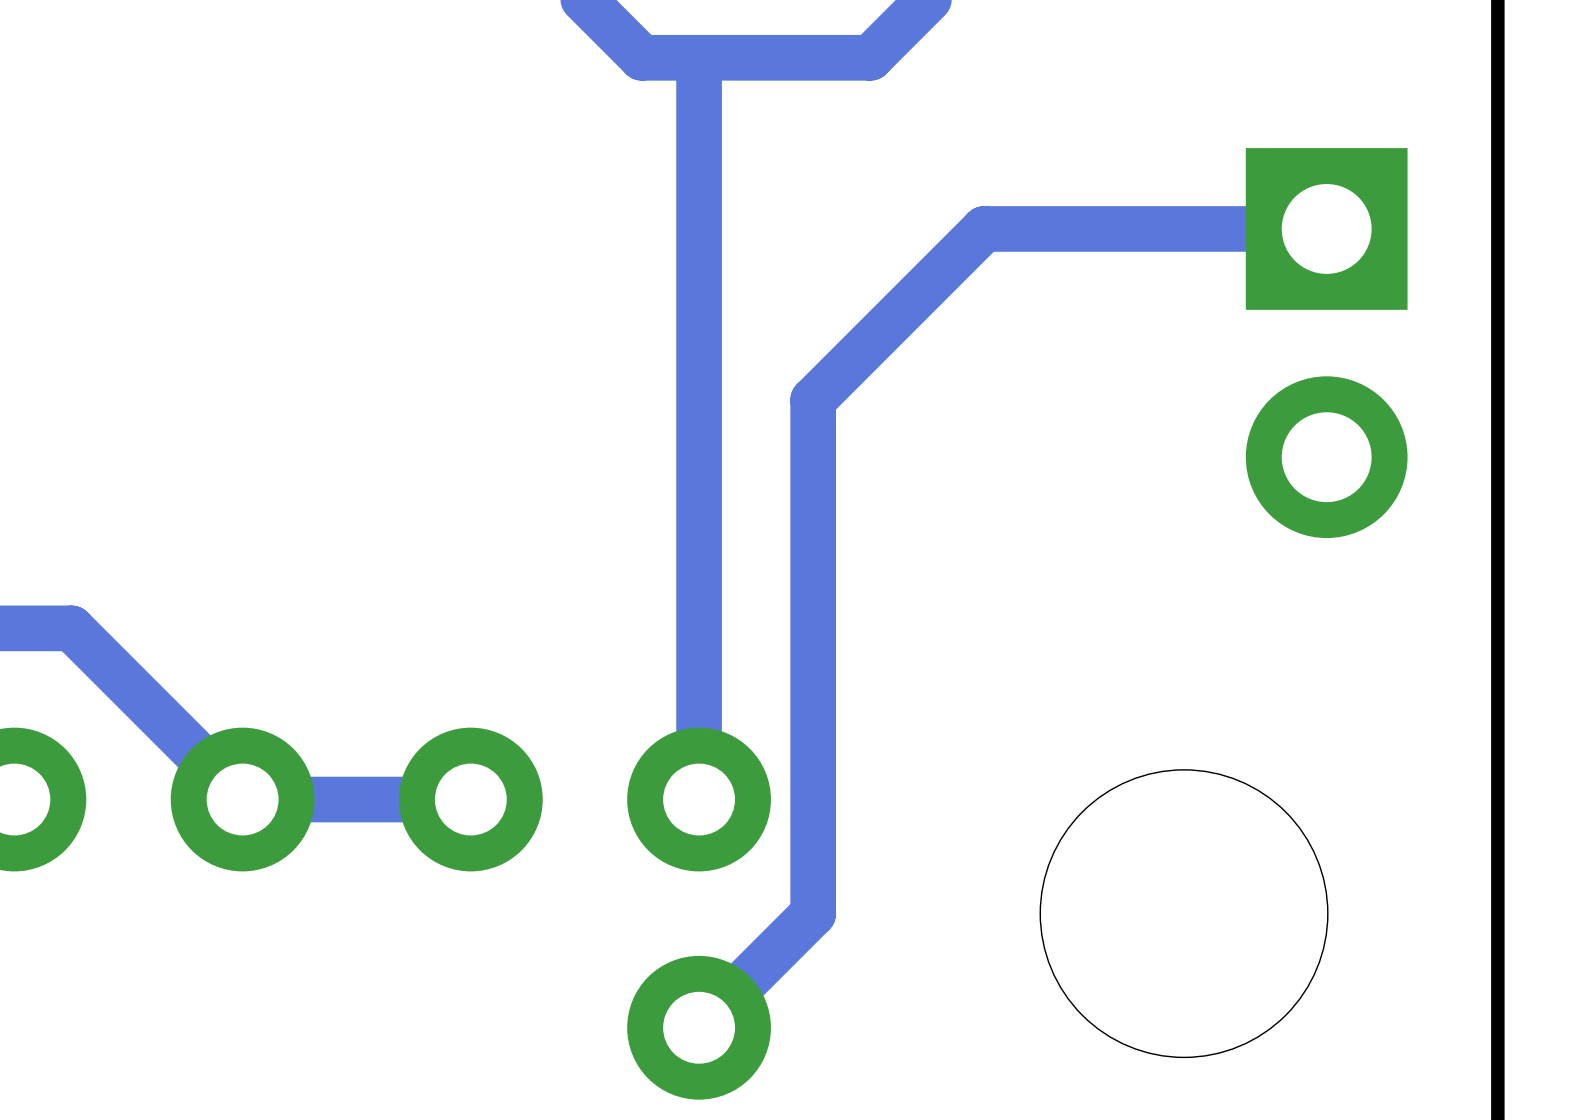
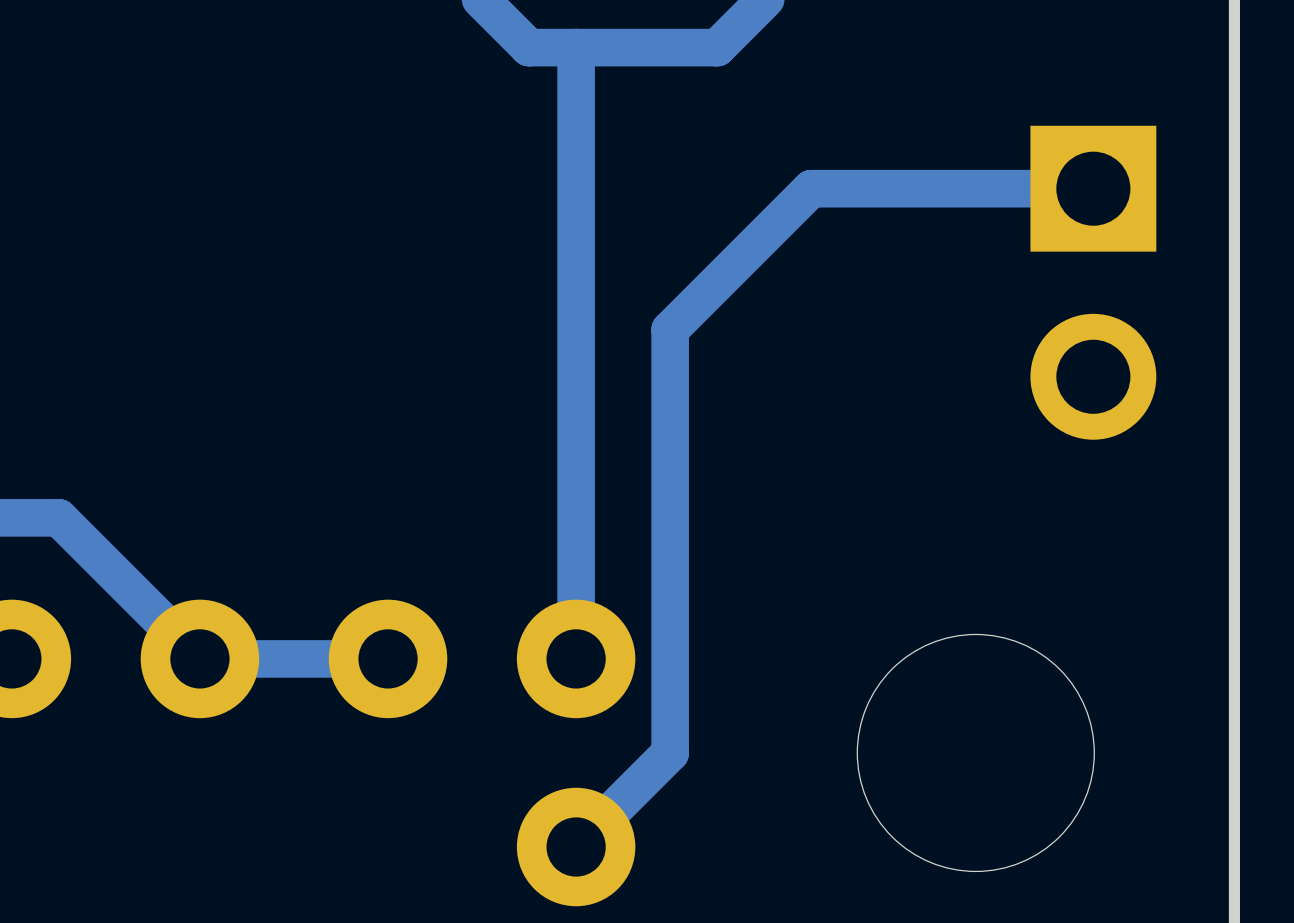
part footprint: [1245, 148, 1408, 539] -> [1030, 125, 1157, 440]

